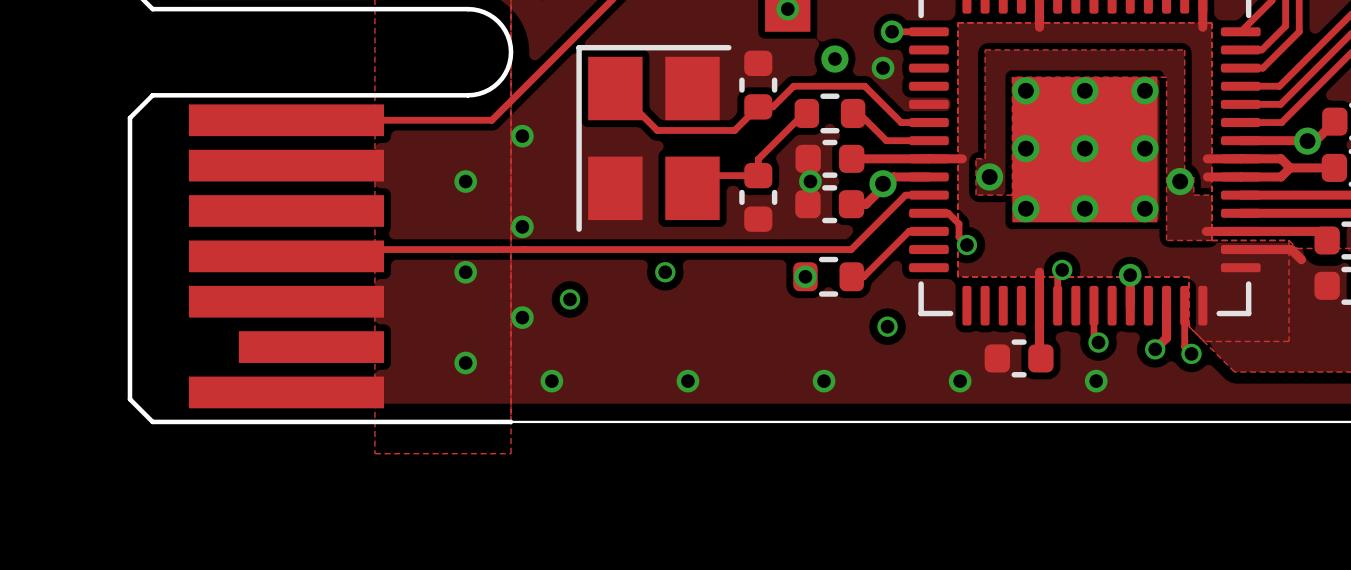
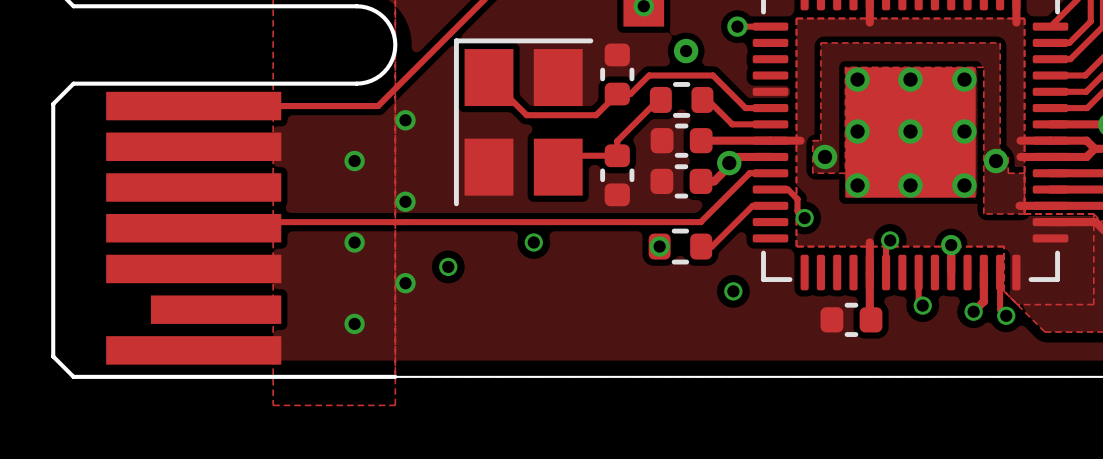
via: (883, 68) -> none
via: (810, 181) -> none
via: (551, 381) -> none
via: (687, 381) -> none
via: (824, 381) -> none
via: (960, 381) -> none
via: (1096, 381) -> none

